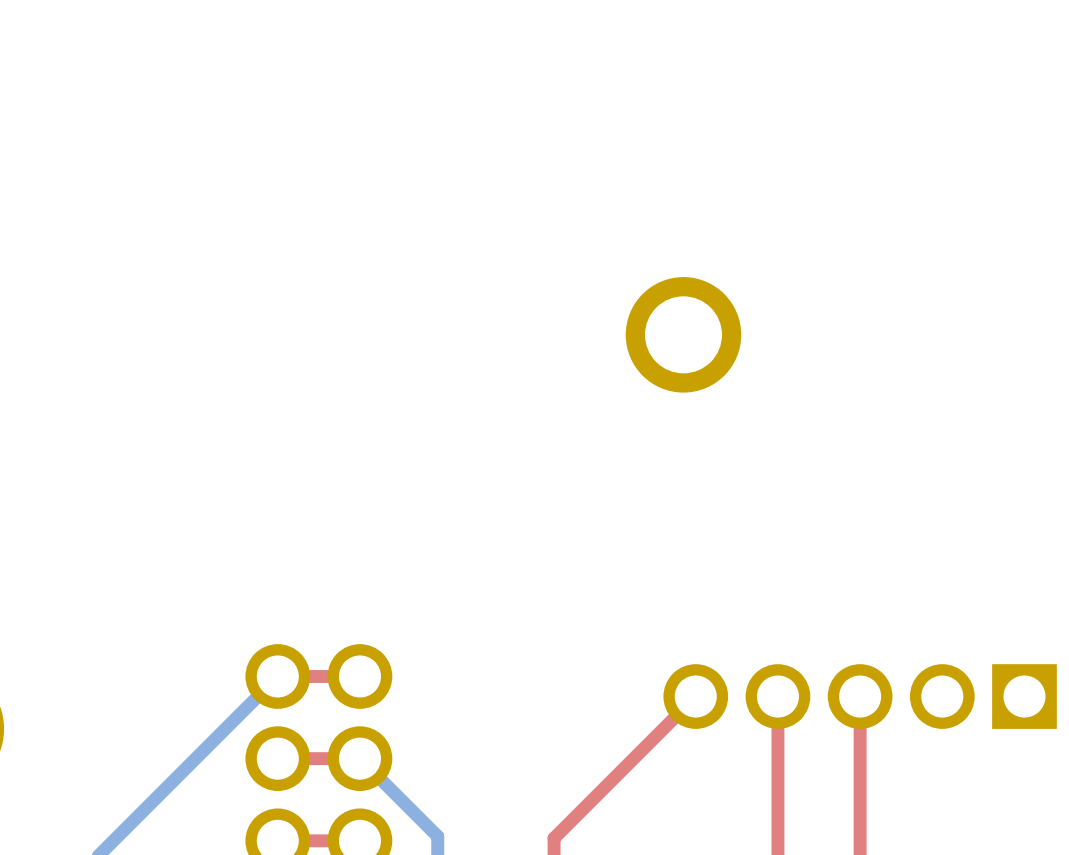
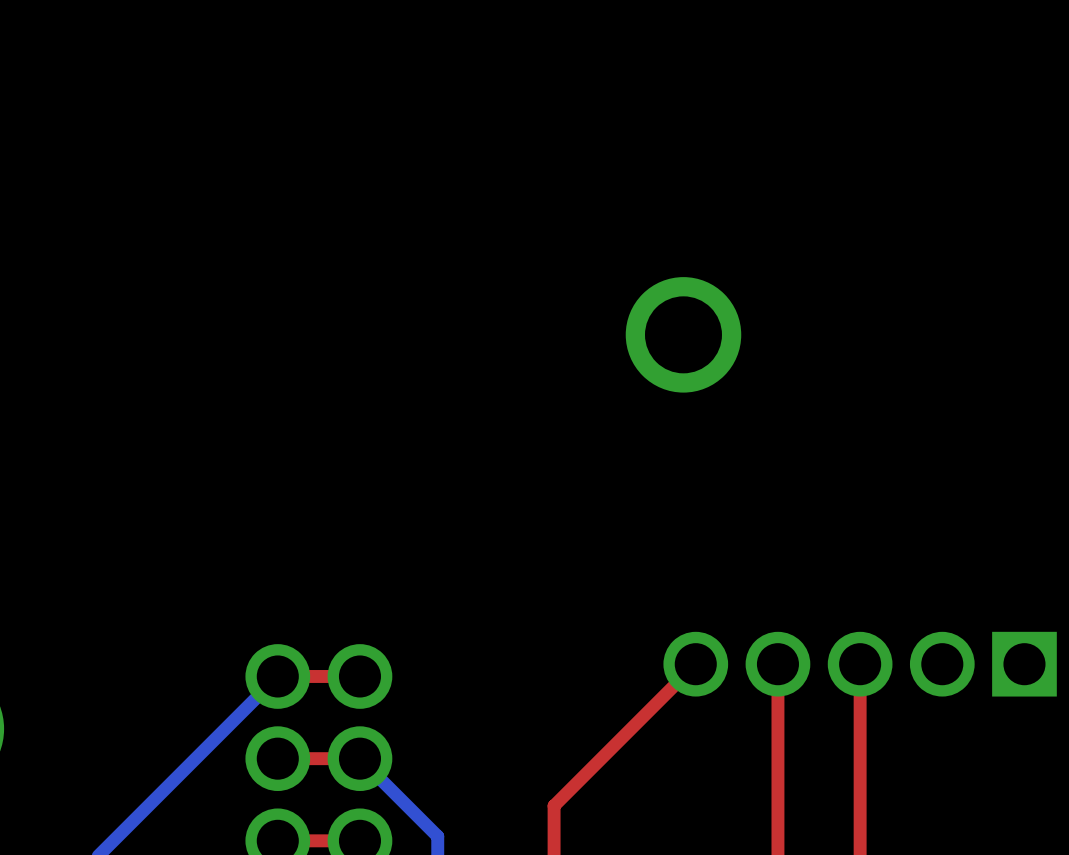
top track: (695, 696) (554, 838) -> (695, 664) (554, 805) (554, 838)
part position: (860, 696) -> (860, 664)

